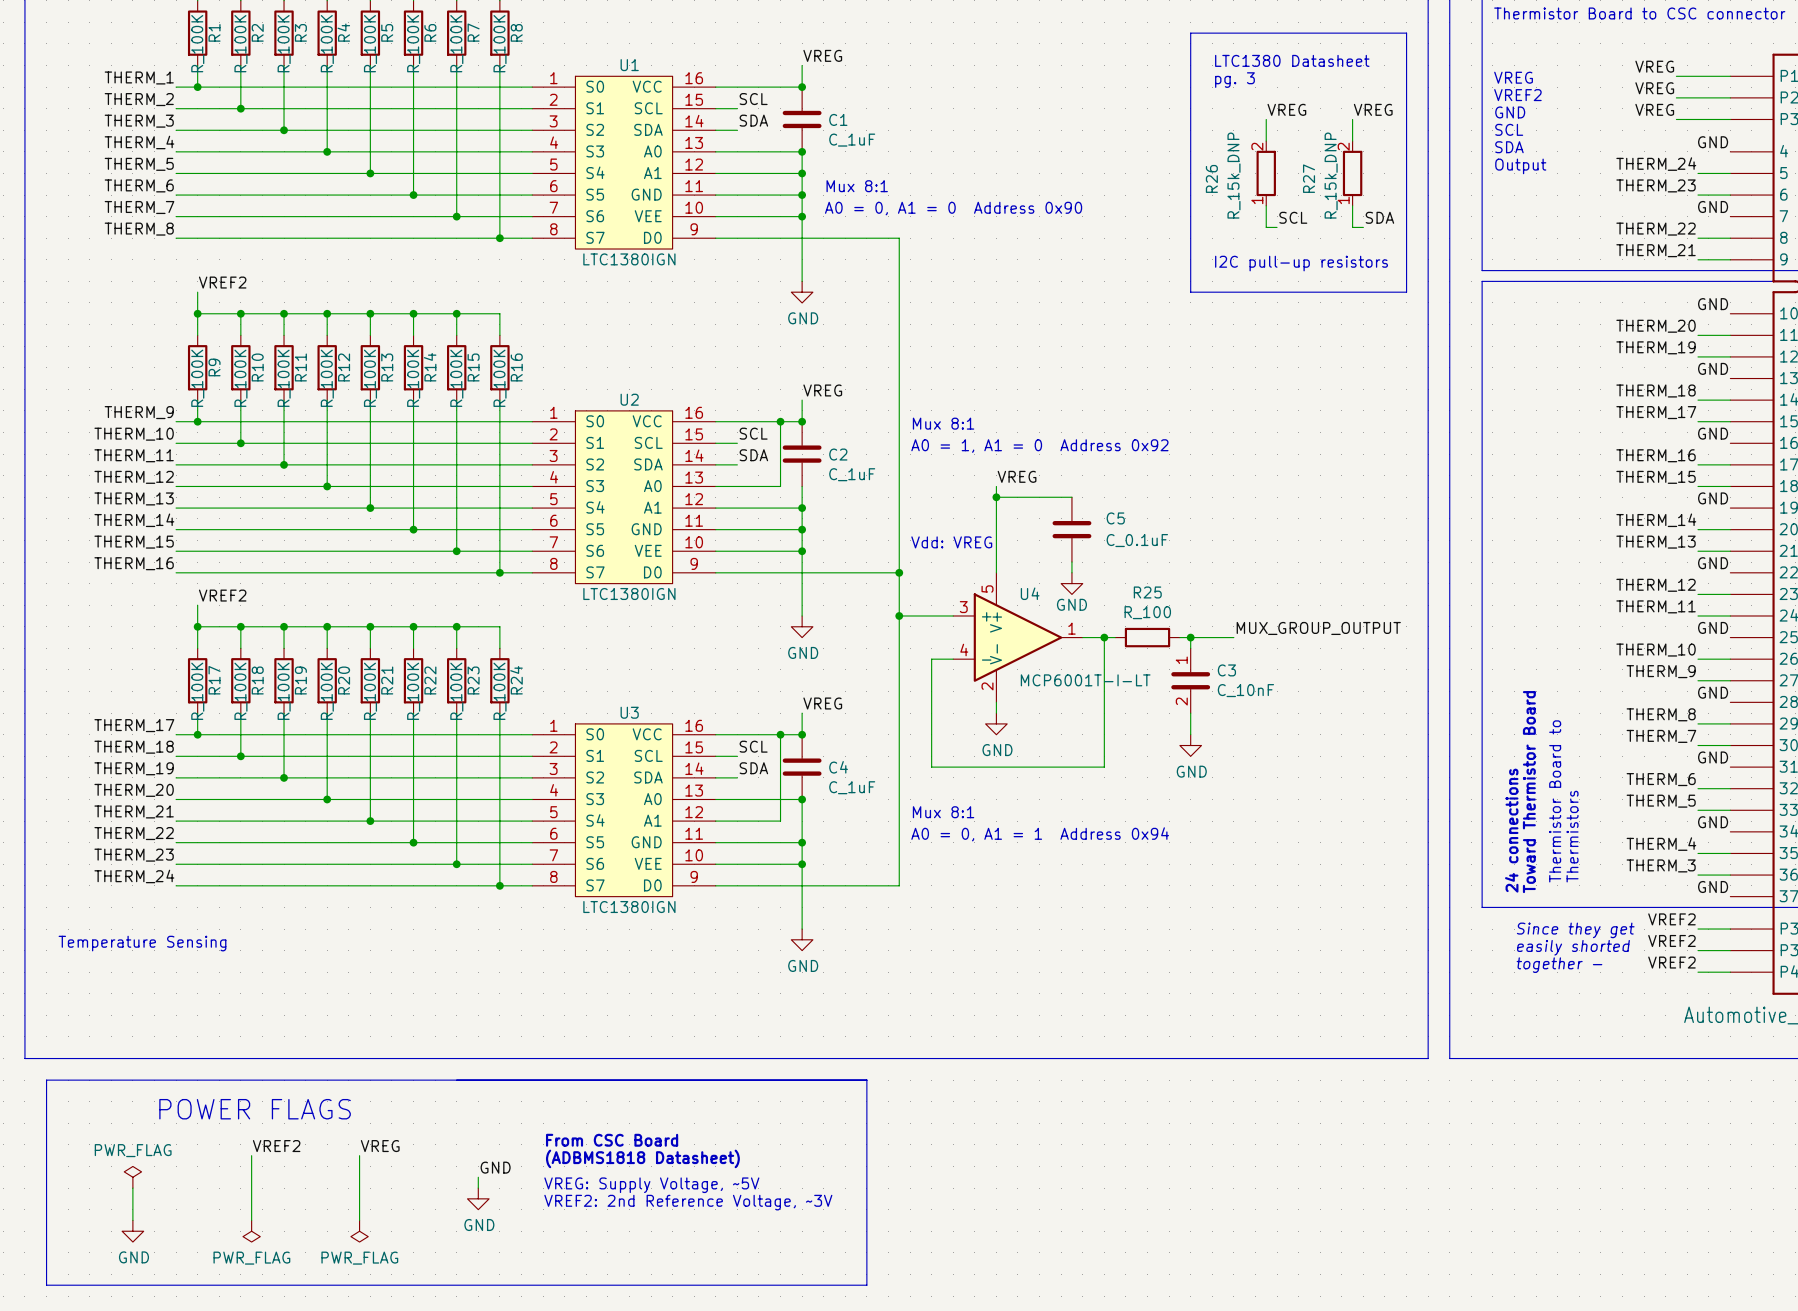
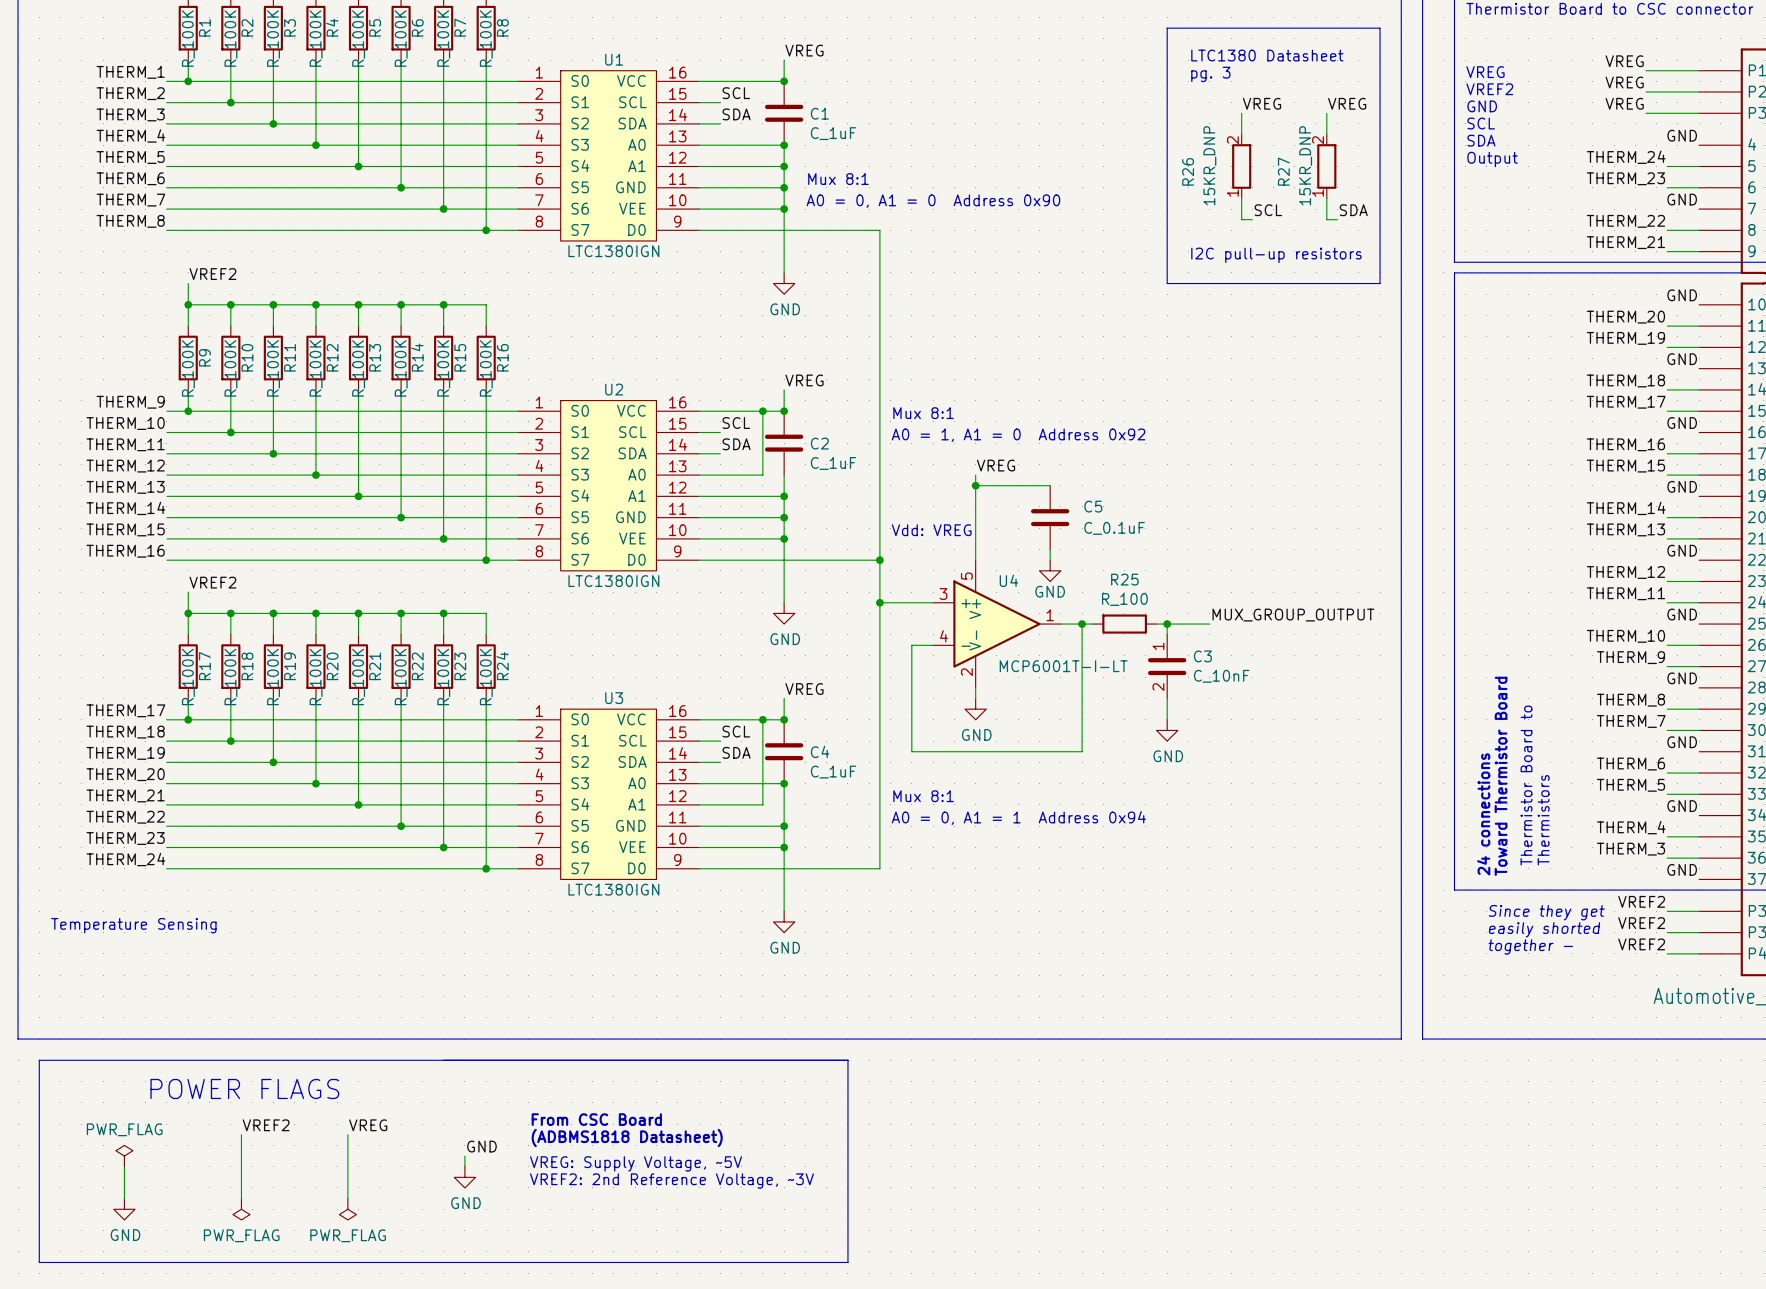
R26 value: R_15k_DNP (1233, 175) -> 15KR_DNP (1209, 165)
R27 value: R_15k_DNP (1331, 175) -> 15KR_DNP (1305, 165)

